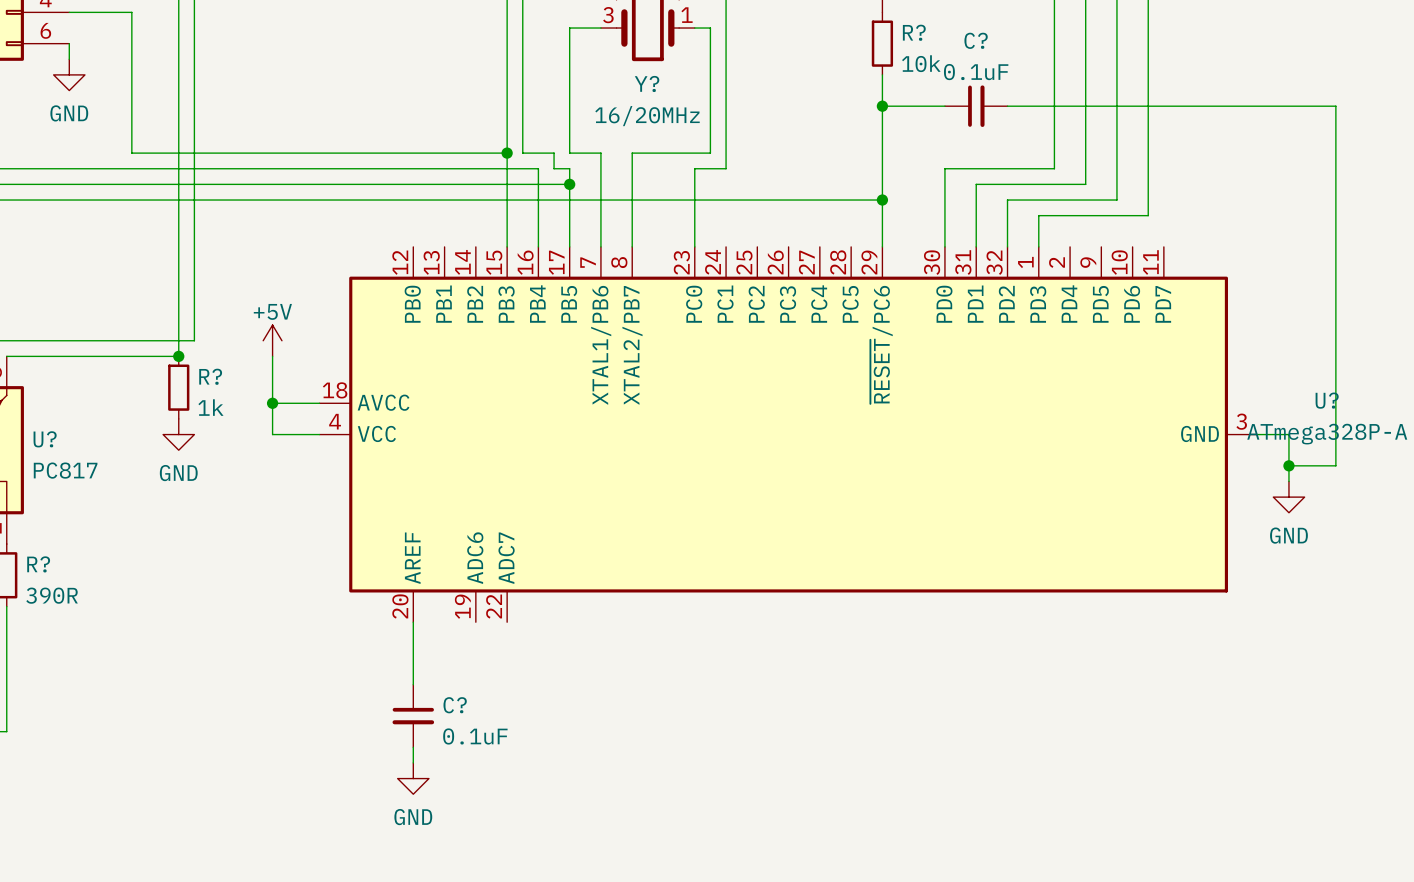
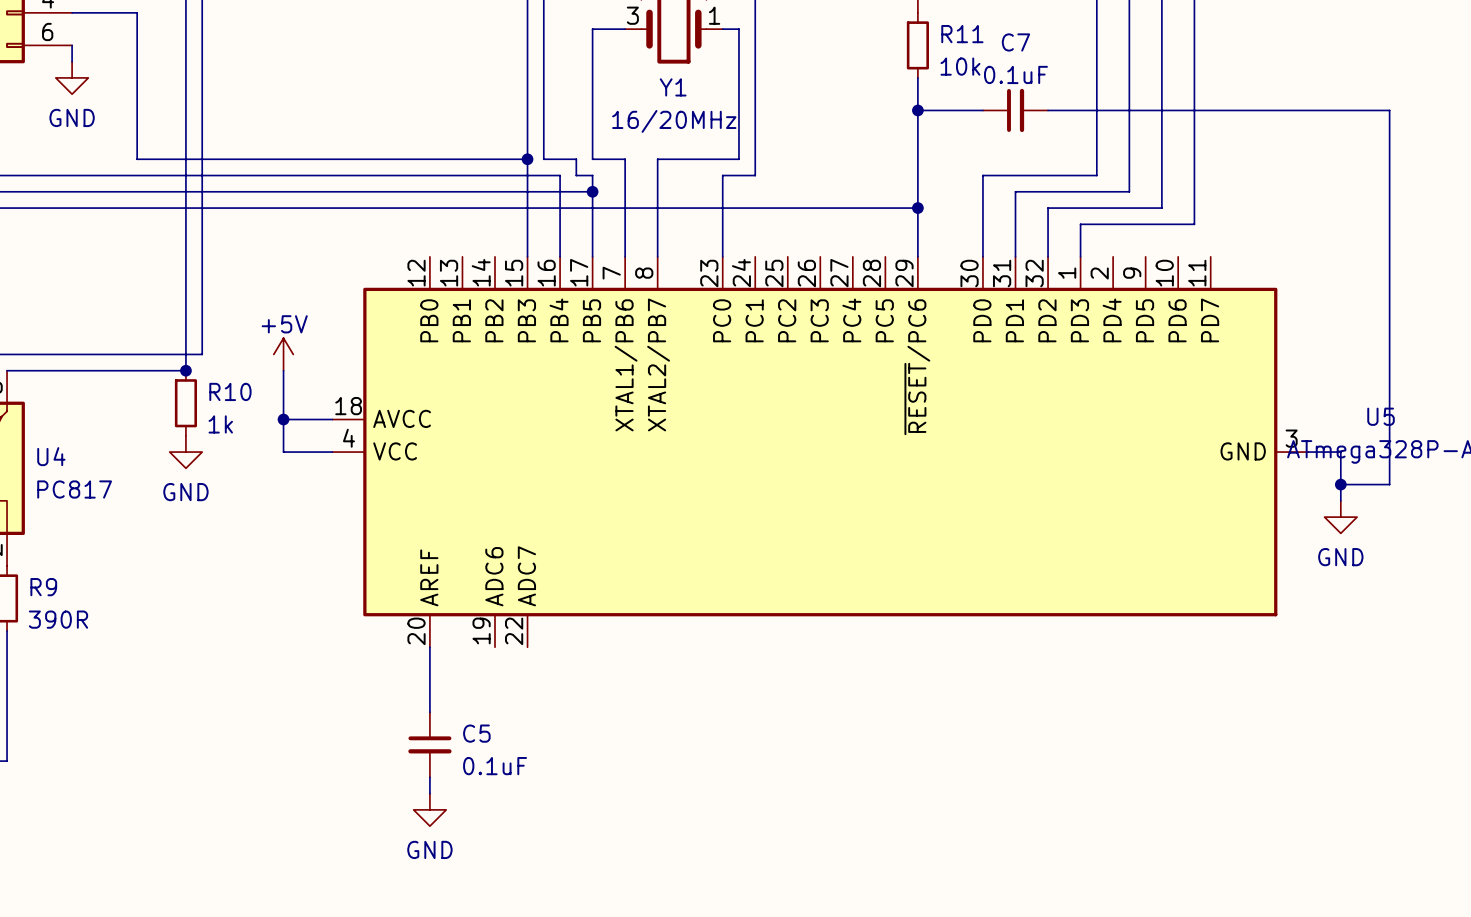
R? name: R? (914, 32) -> R11 (962, 34)
C? name: C? (976, 40) -> C7 (1015, 42)
Y? name: Y? (647, 83) -> Y1 (673, 87)
R? name: R? (210, 376) -> R10 (230, 391)
U? name: U? (1327, 400) -> U5 (1381, 416)
U? name: U? (45, 439) -> U4 (51, 456)
R? name: R? (38, 564) -> R9 (43, 587)
C? name: C? (455, 705) -> C5 (476, 733)

